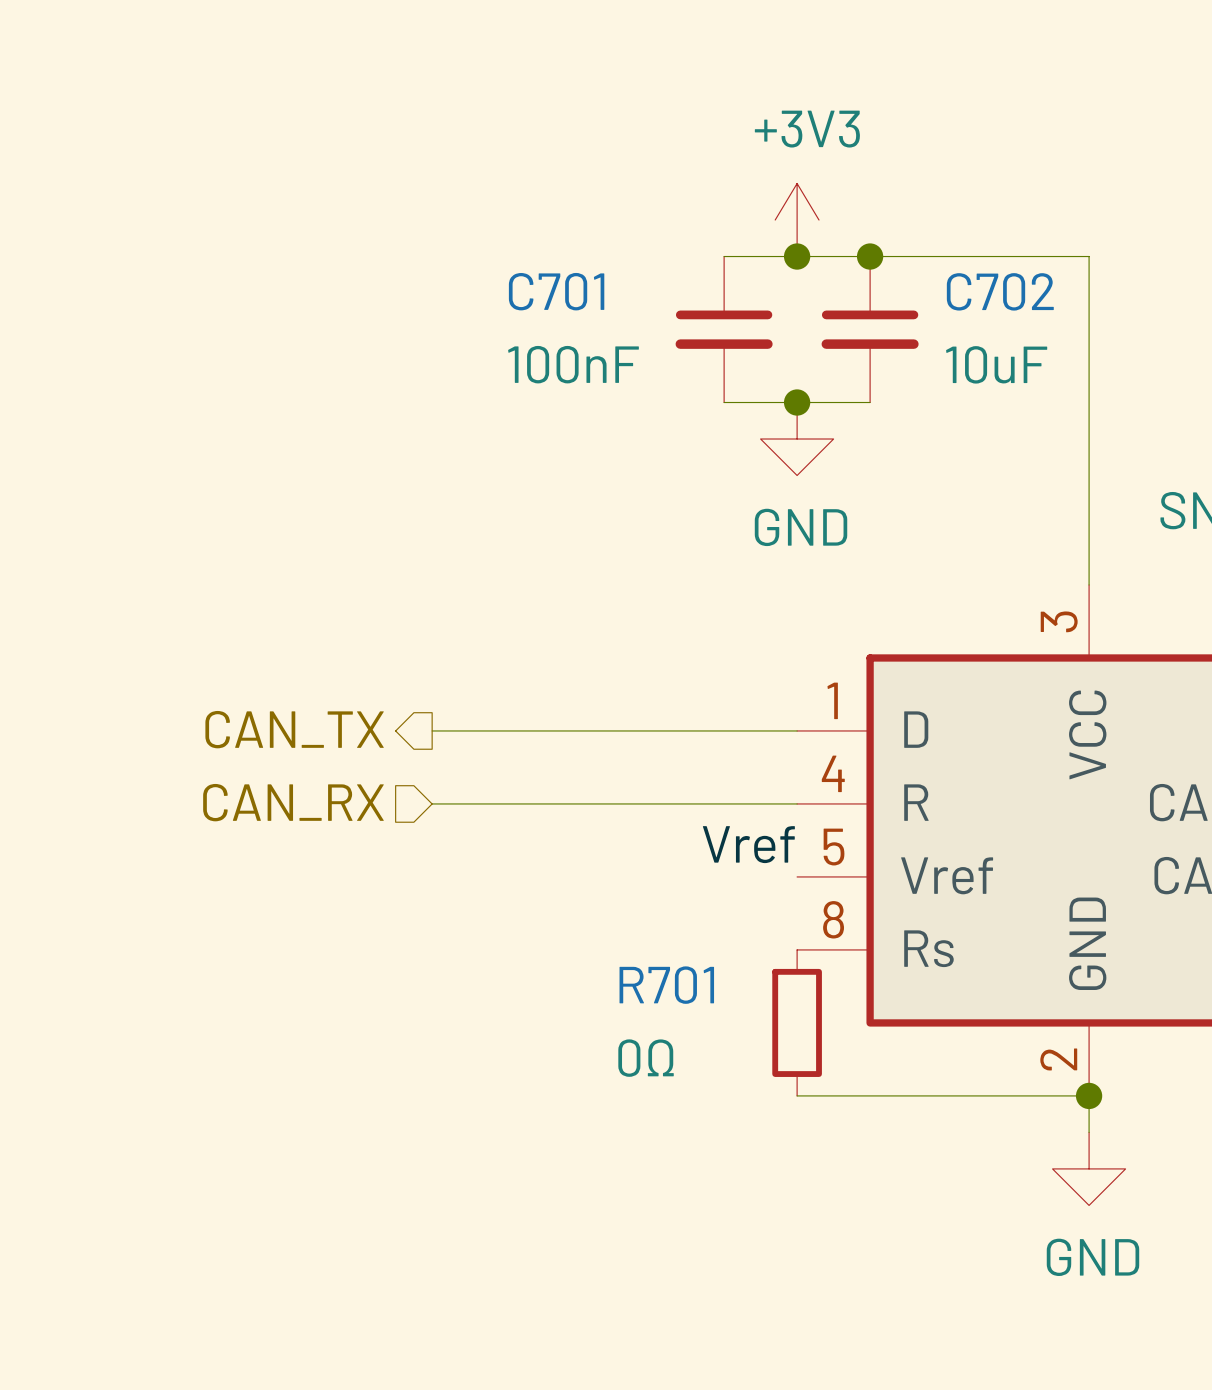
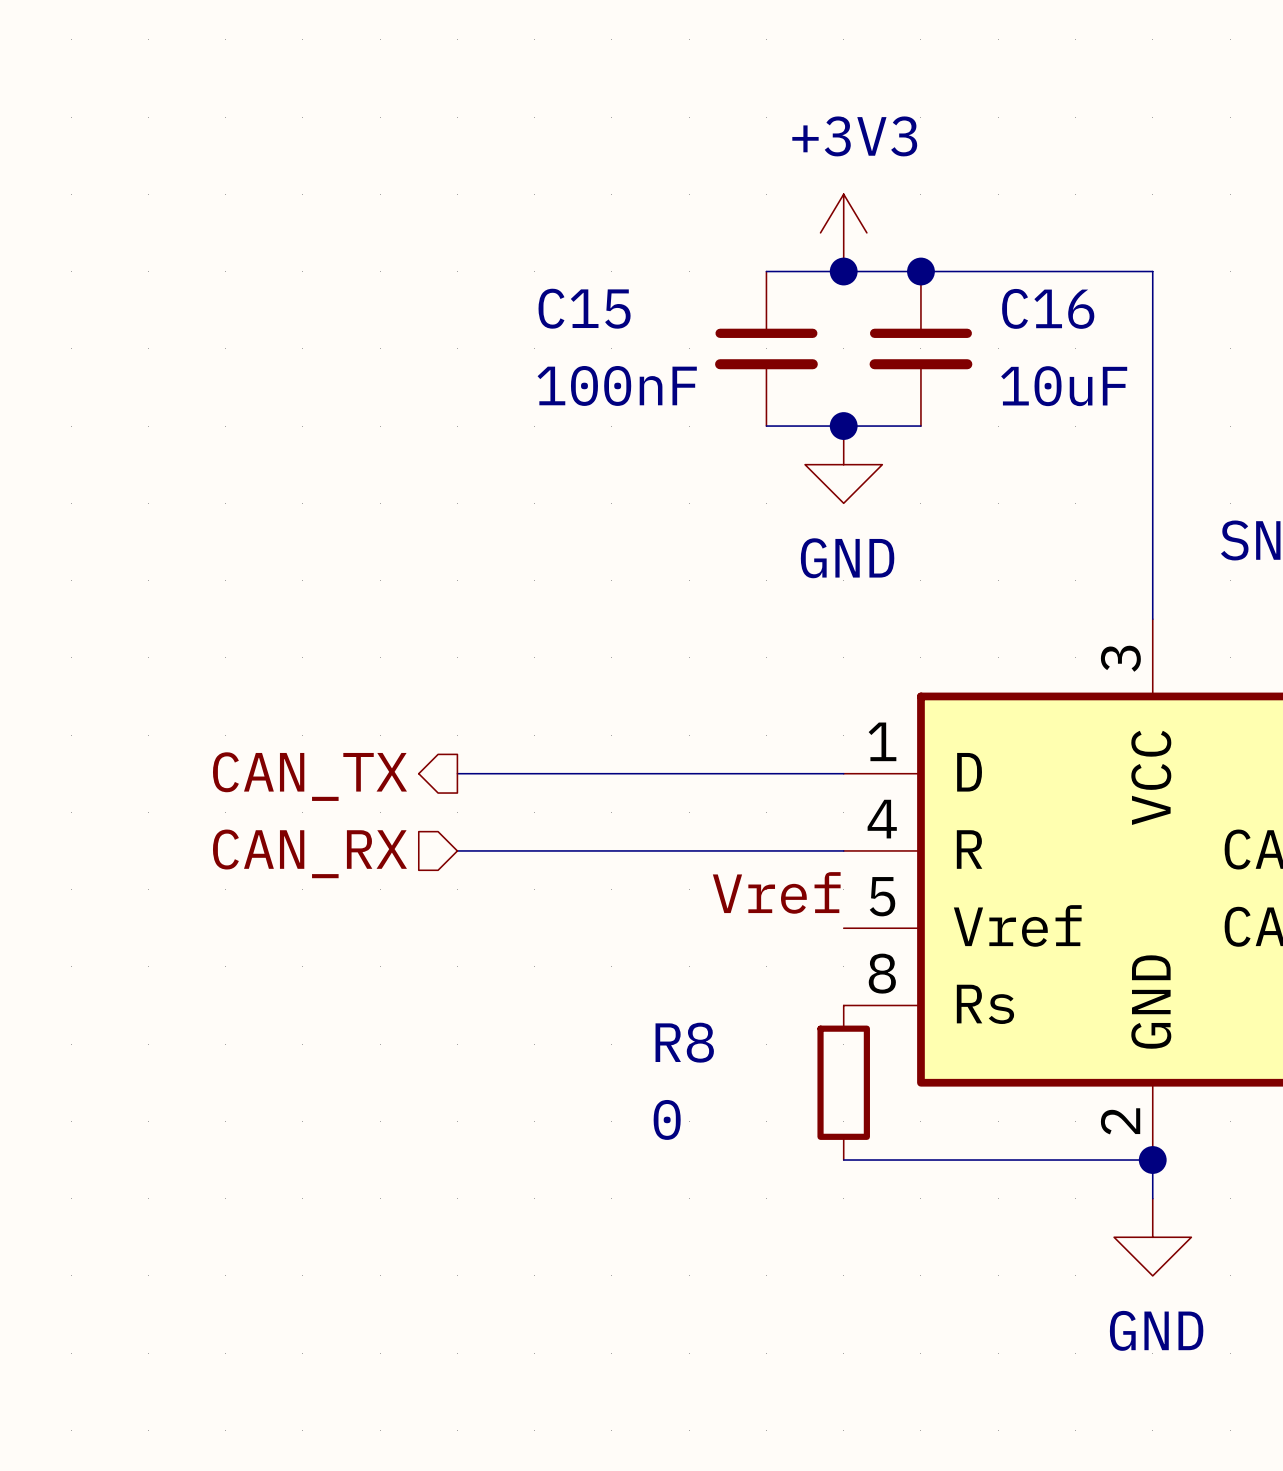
C701 name: C701 (556, 291) -> C15 (584, 308)
C702 name: C702 (1000, 291) -> C16 (1048, 308)
R701 name: R701 (666, 985) -> R8 (684, 1042)
R701 value: 0Ω (646, 1058) -> 0 (667, 1119)

